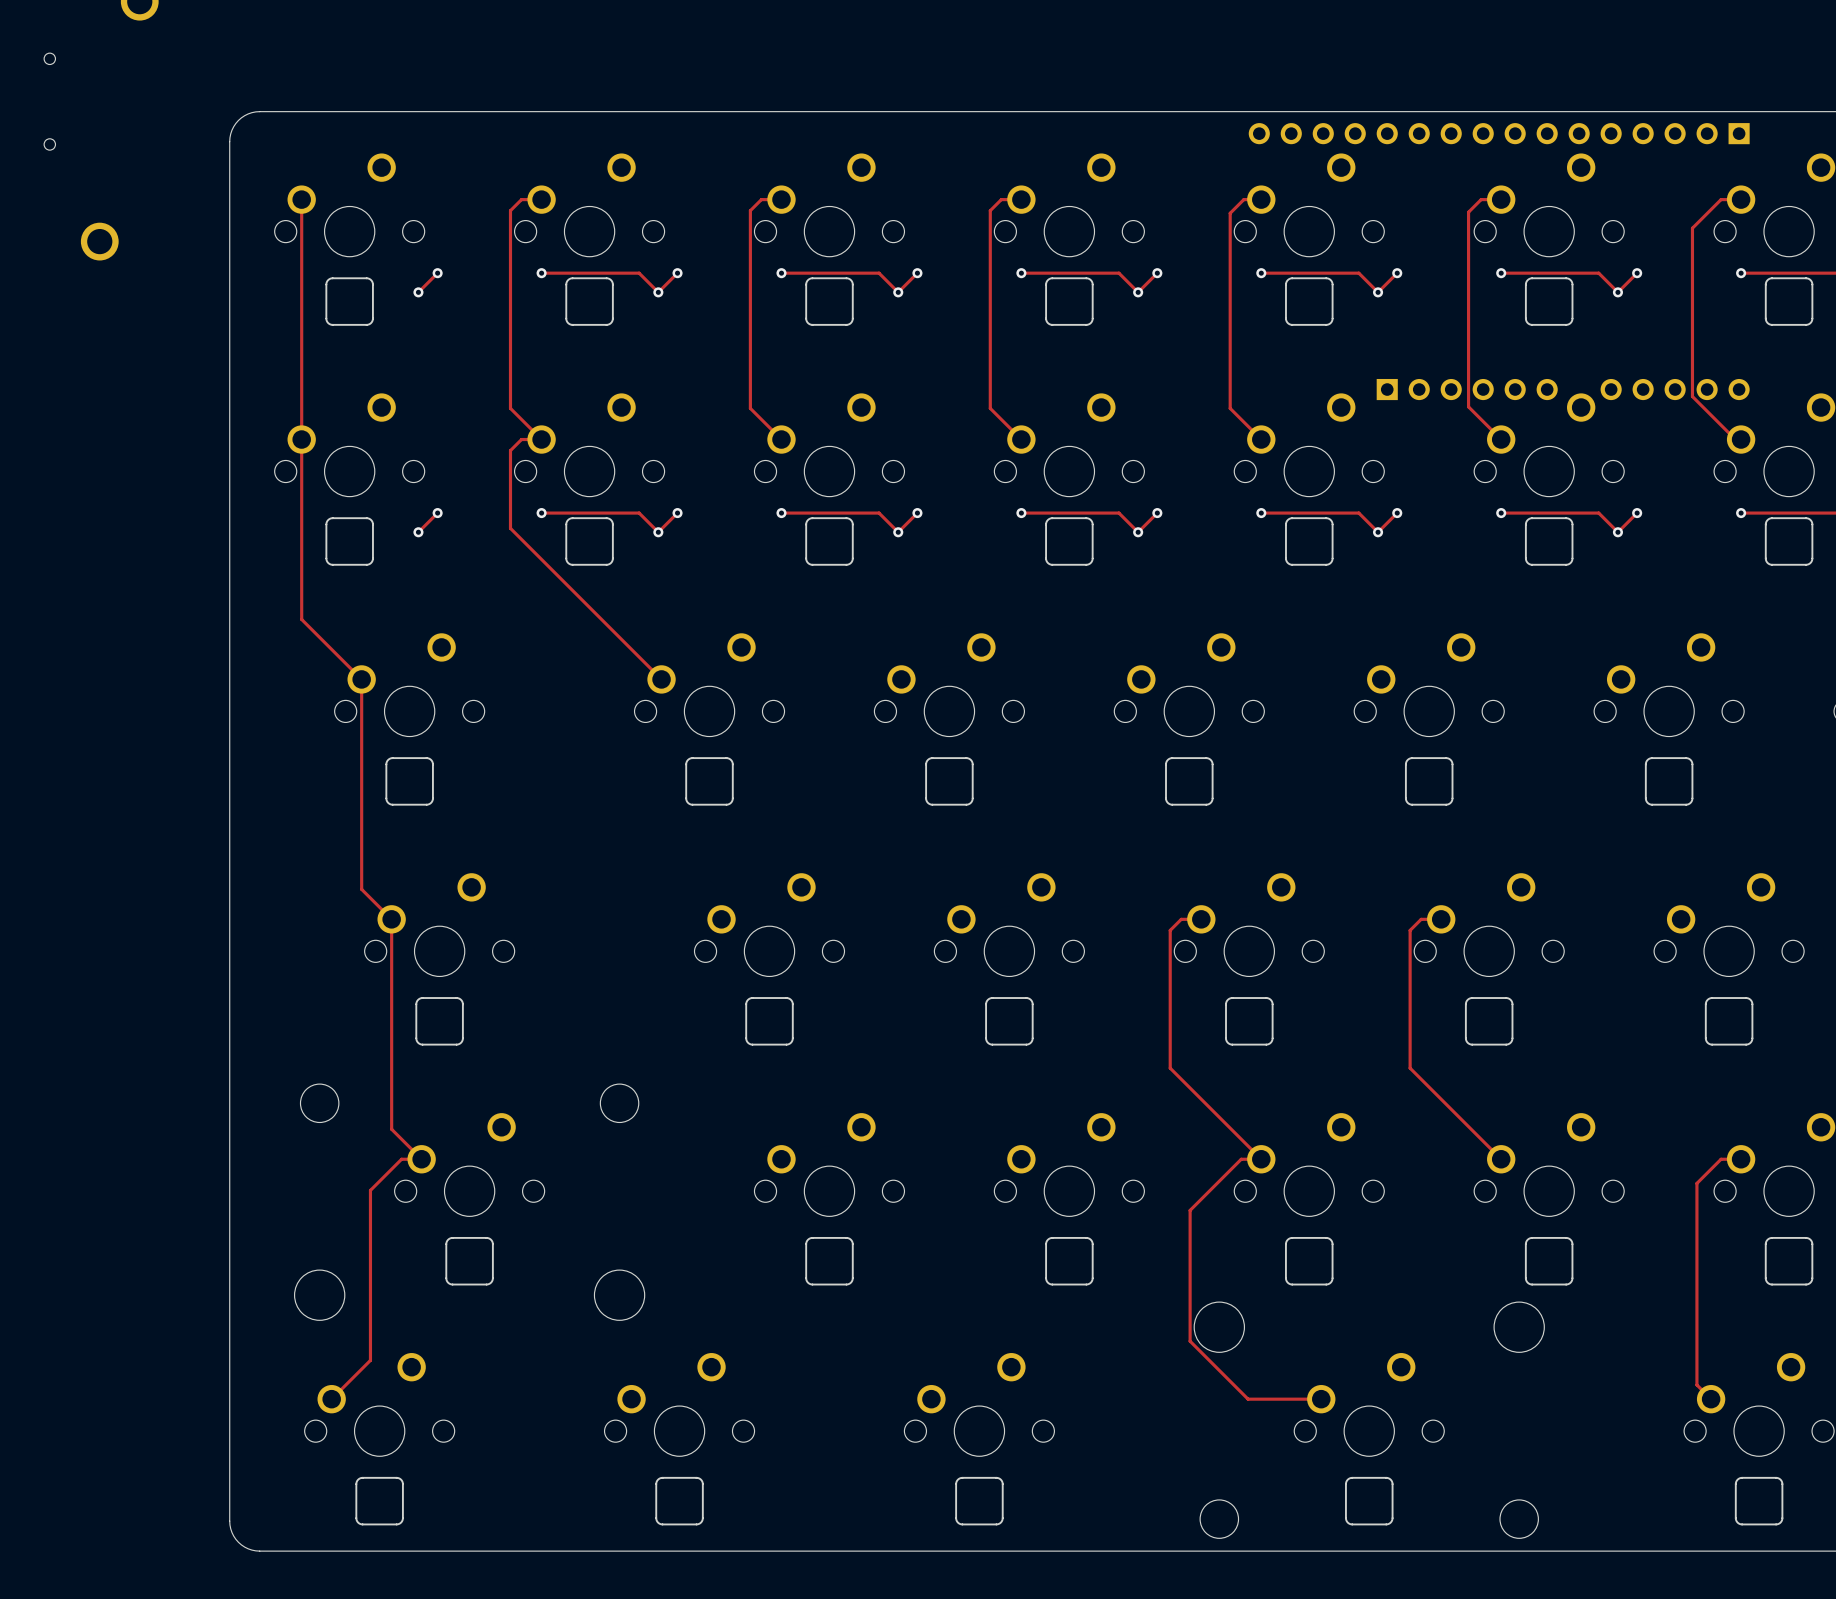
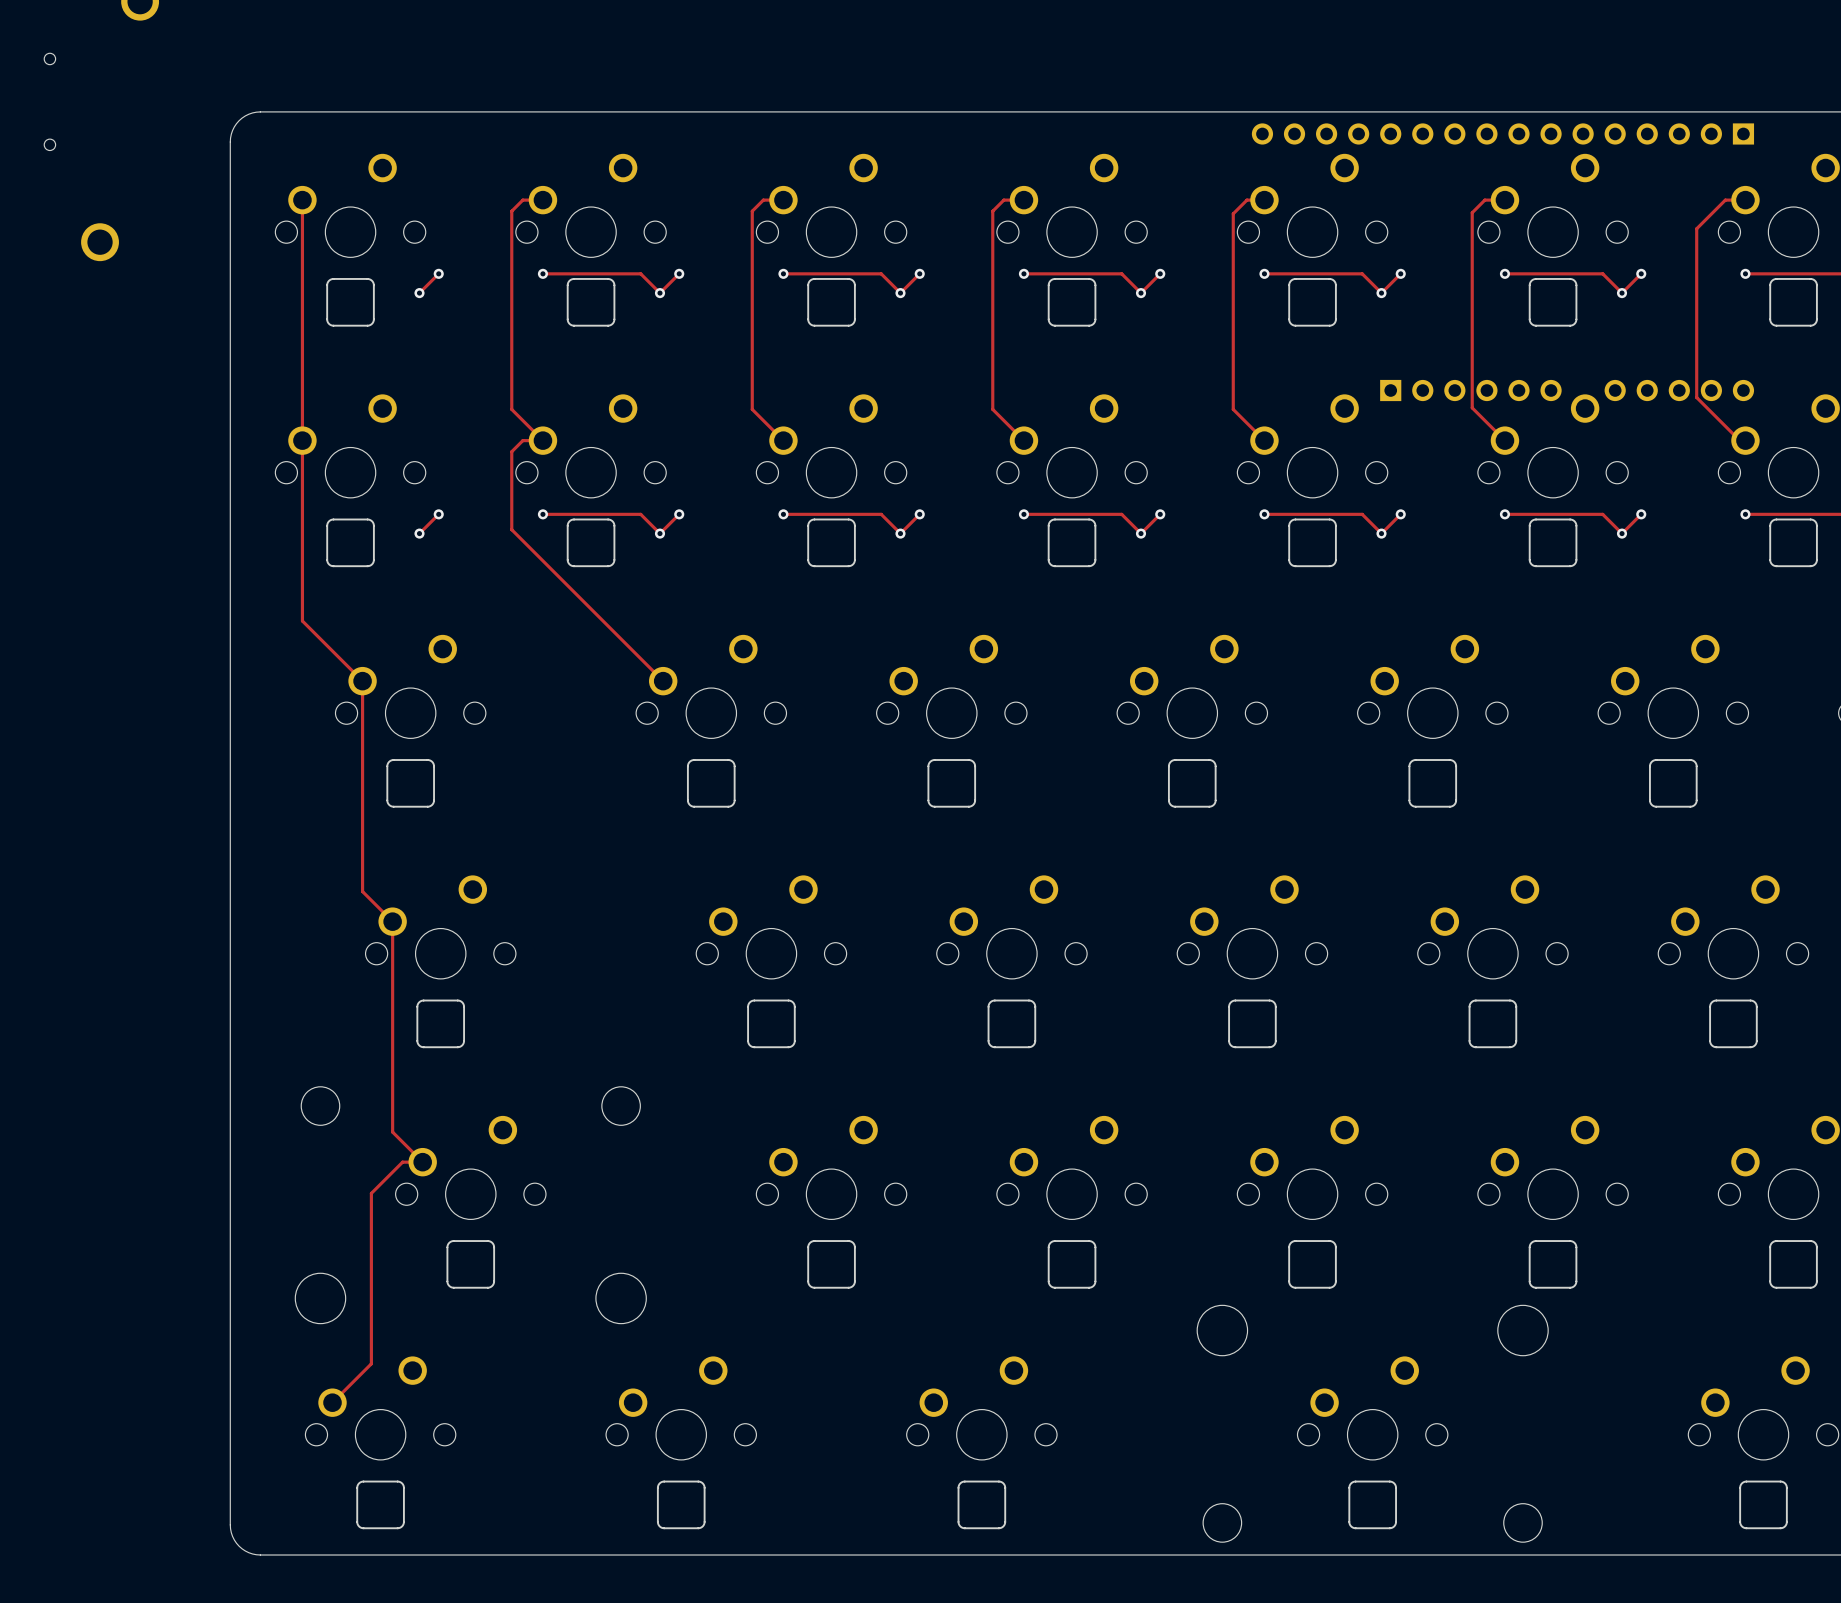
track: (1201, 919) (1181, 919) (1170, 930) (1170, 1068) (1261, 1159) (1241, 1159) (1190, 1210) (1190, 1341) (1248, 1399) (1321, 1399) -> none
track: (1441, 919) (1421, 919) (1410, 930) (1410, 1068) (1501, 1159) -> none
track: (1741, 1159) (1721, 1159) (1696, 1183) (1696, 1385) (1711, 1399) -> none

